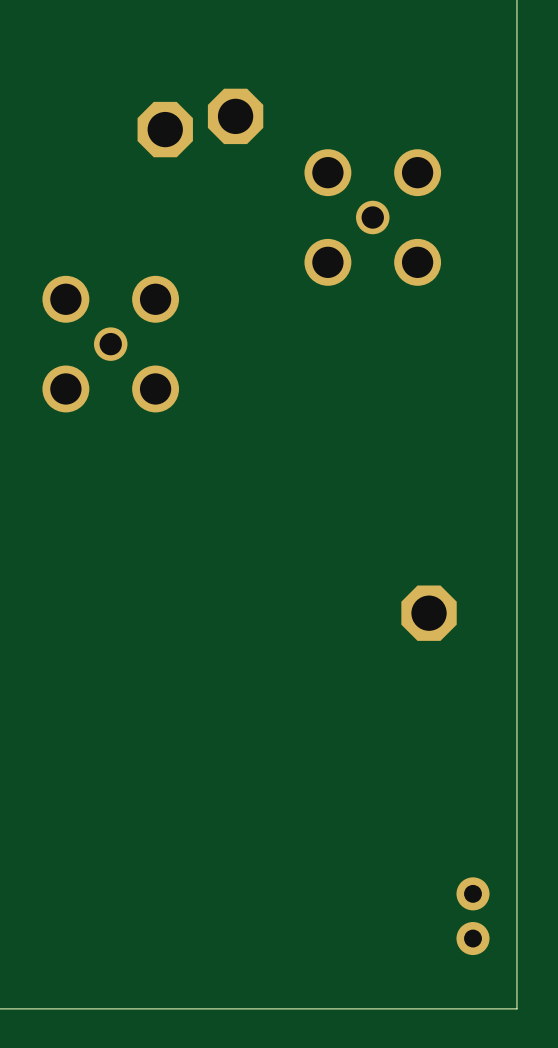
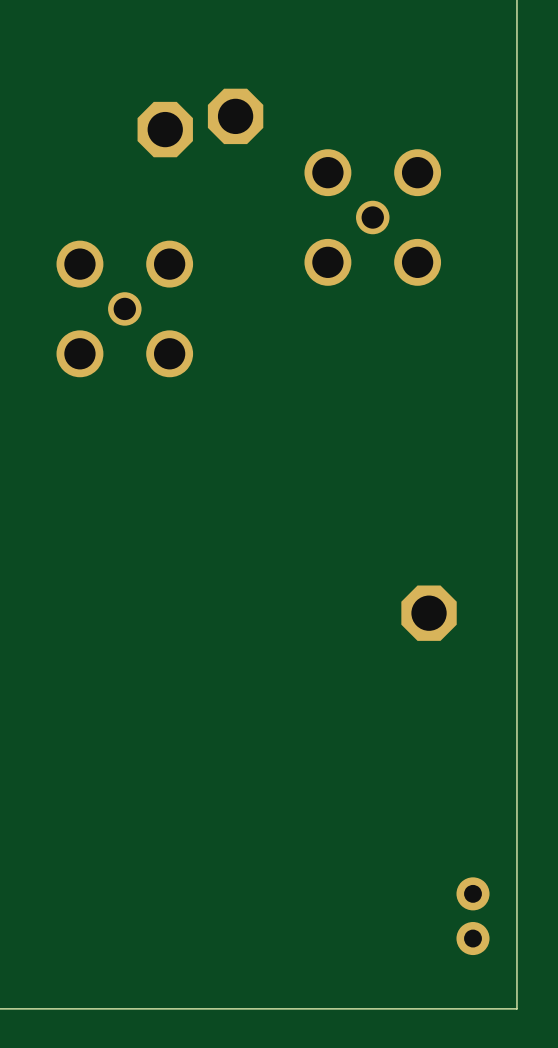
part position: (110, 344) -> (124, 308)

